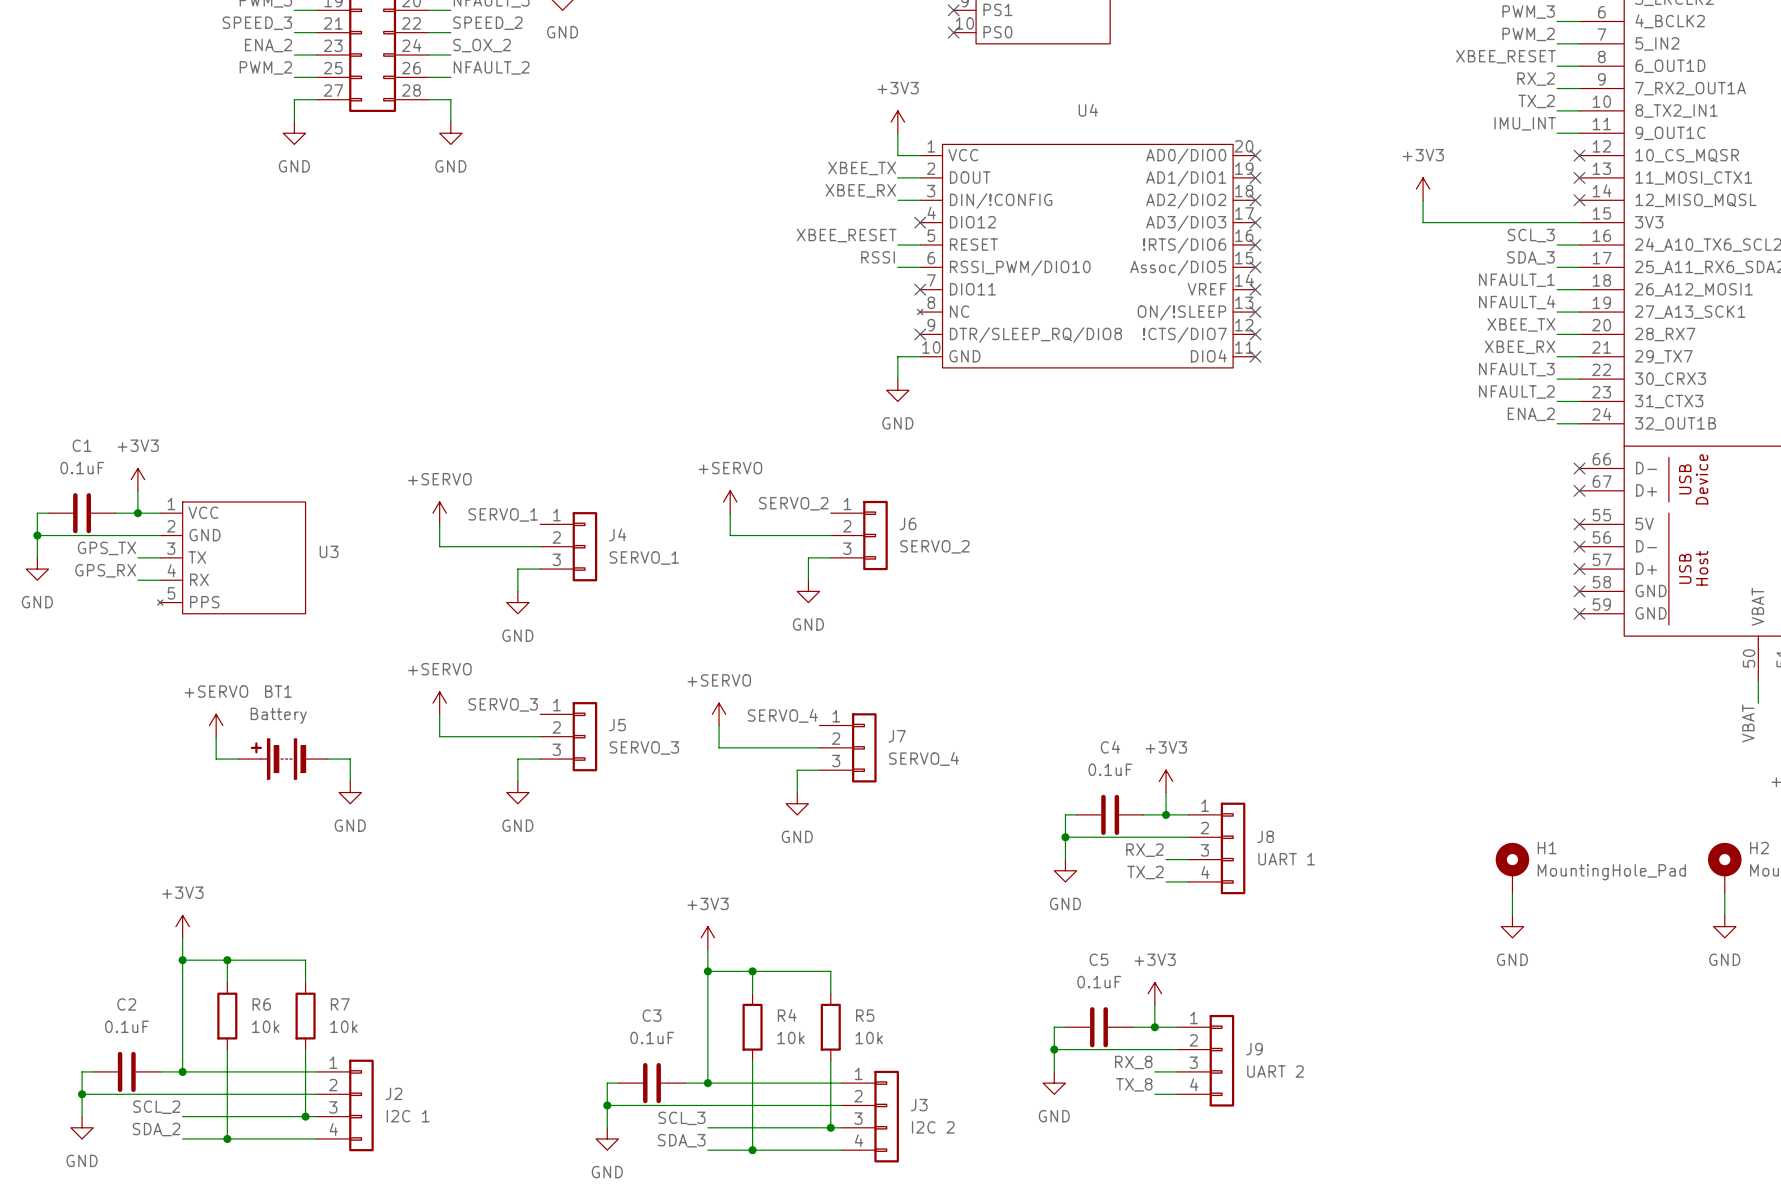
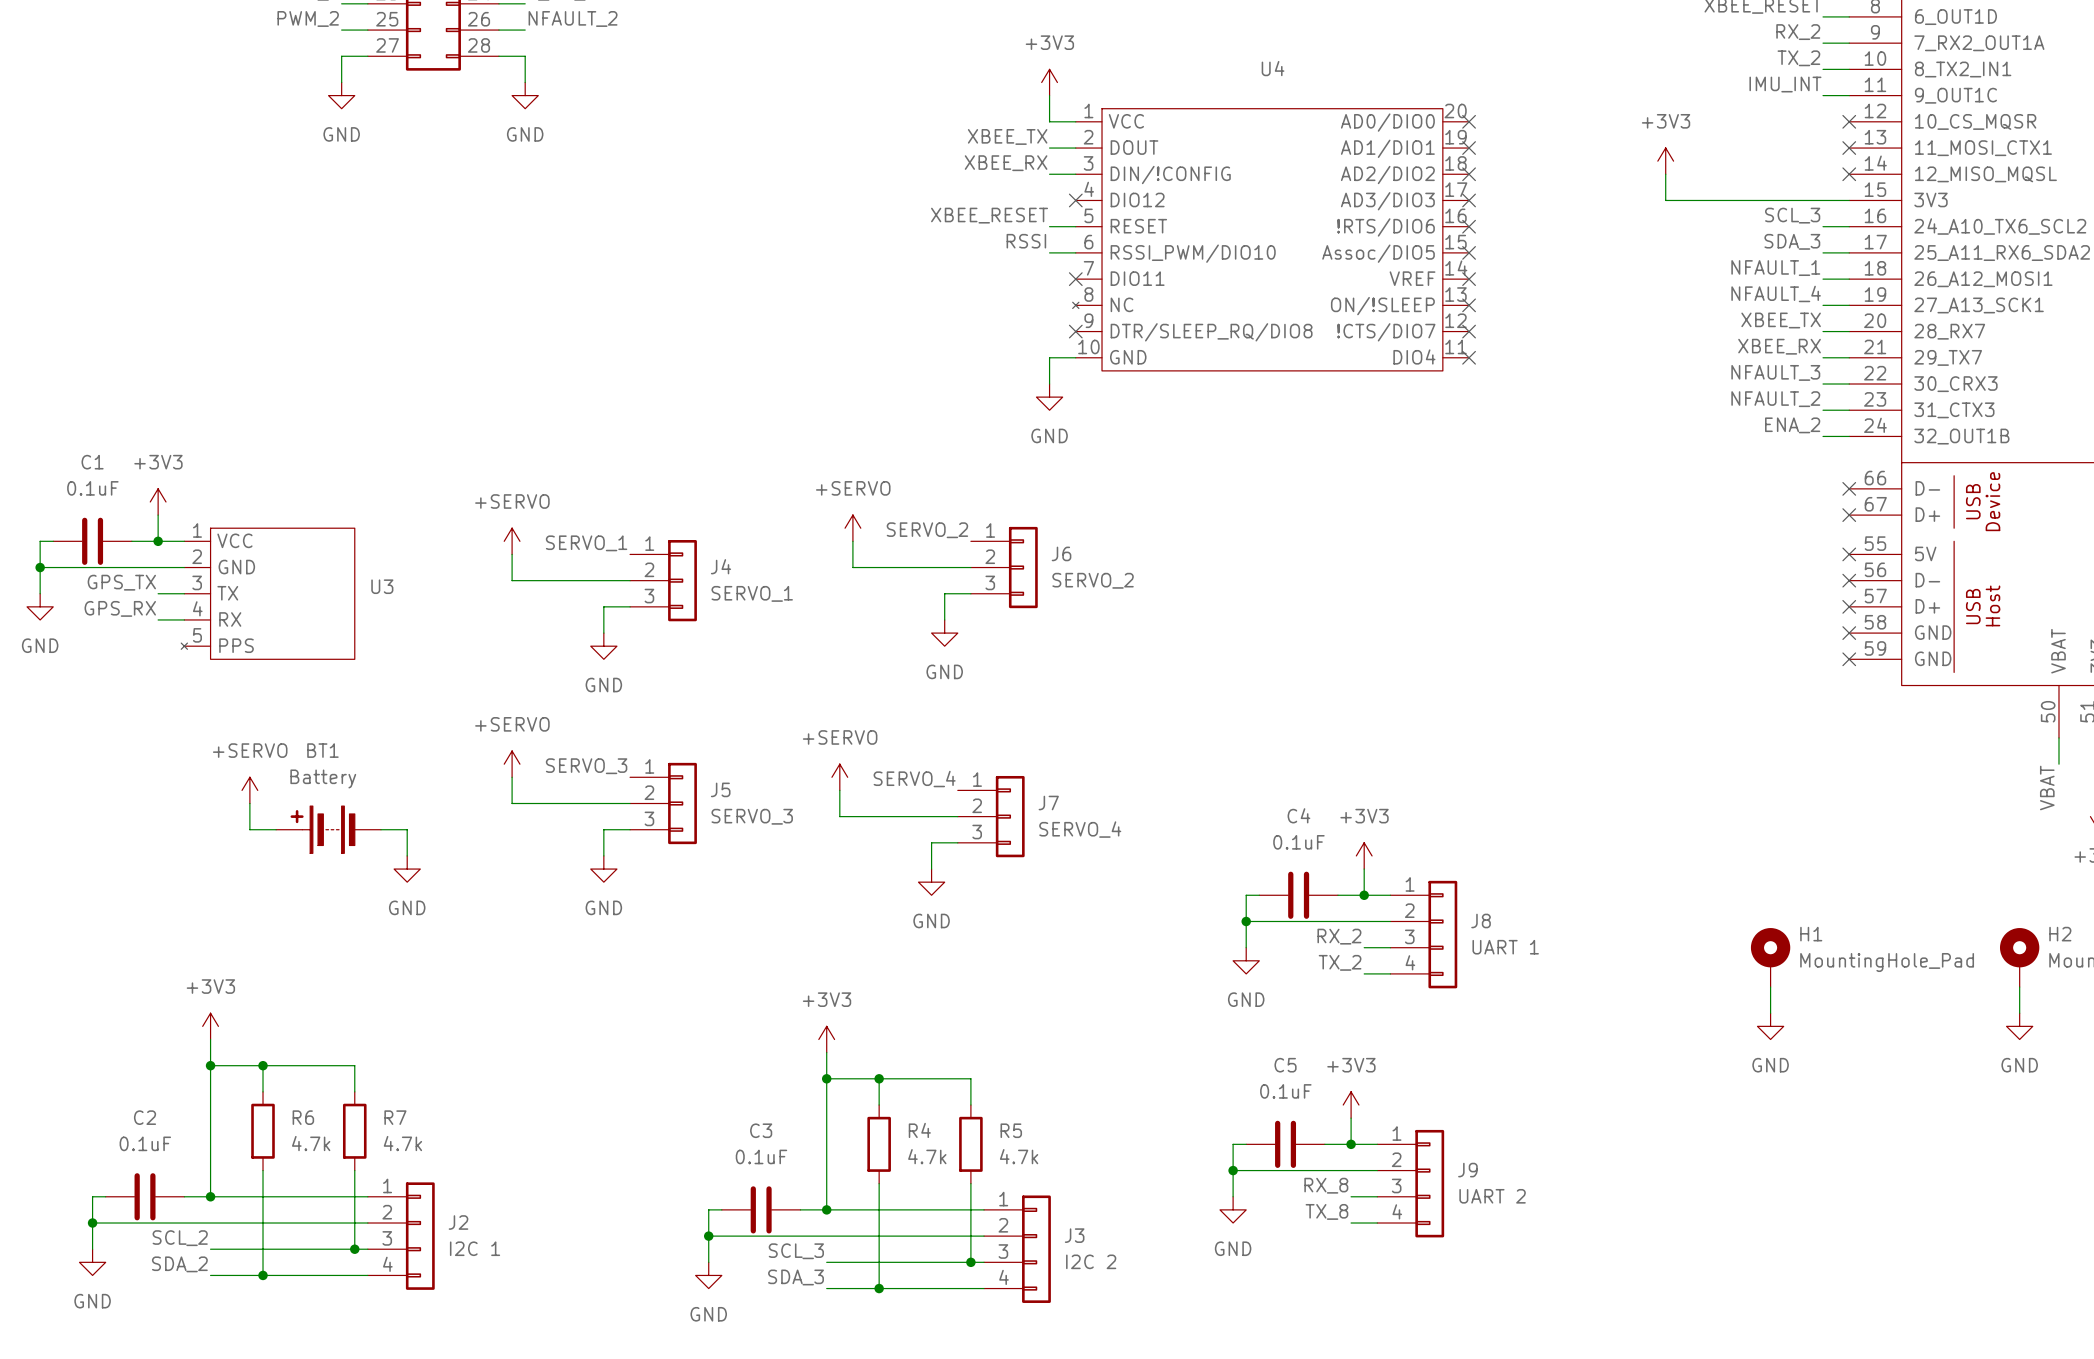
R6 value: 10k (265, 1026) -> 4.7k (311, 1143)
R7 value: 10k (343, 1026) -> 4.7k (402, 1143)
R4 value: 10k (790, 1037) -> 4.7k (927, 1156)
R5 value: 10k (869, 1037) -> 4.7k (1019, 1156)

